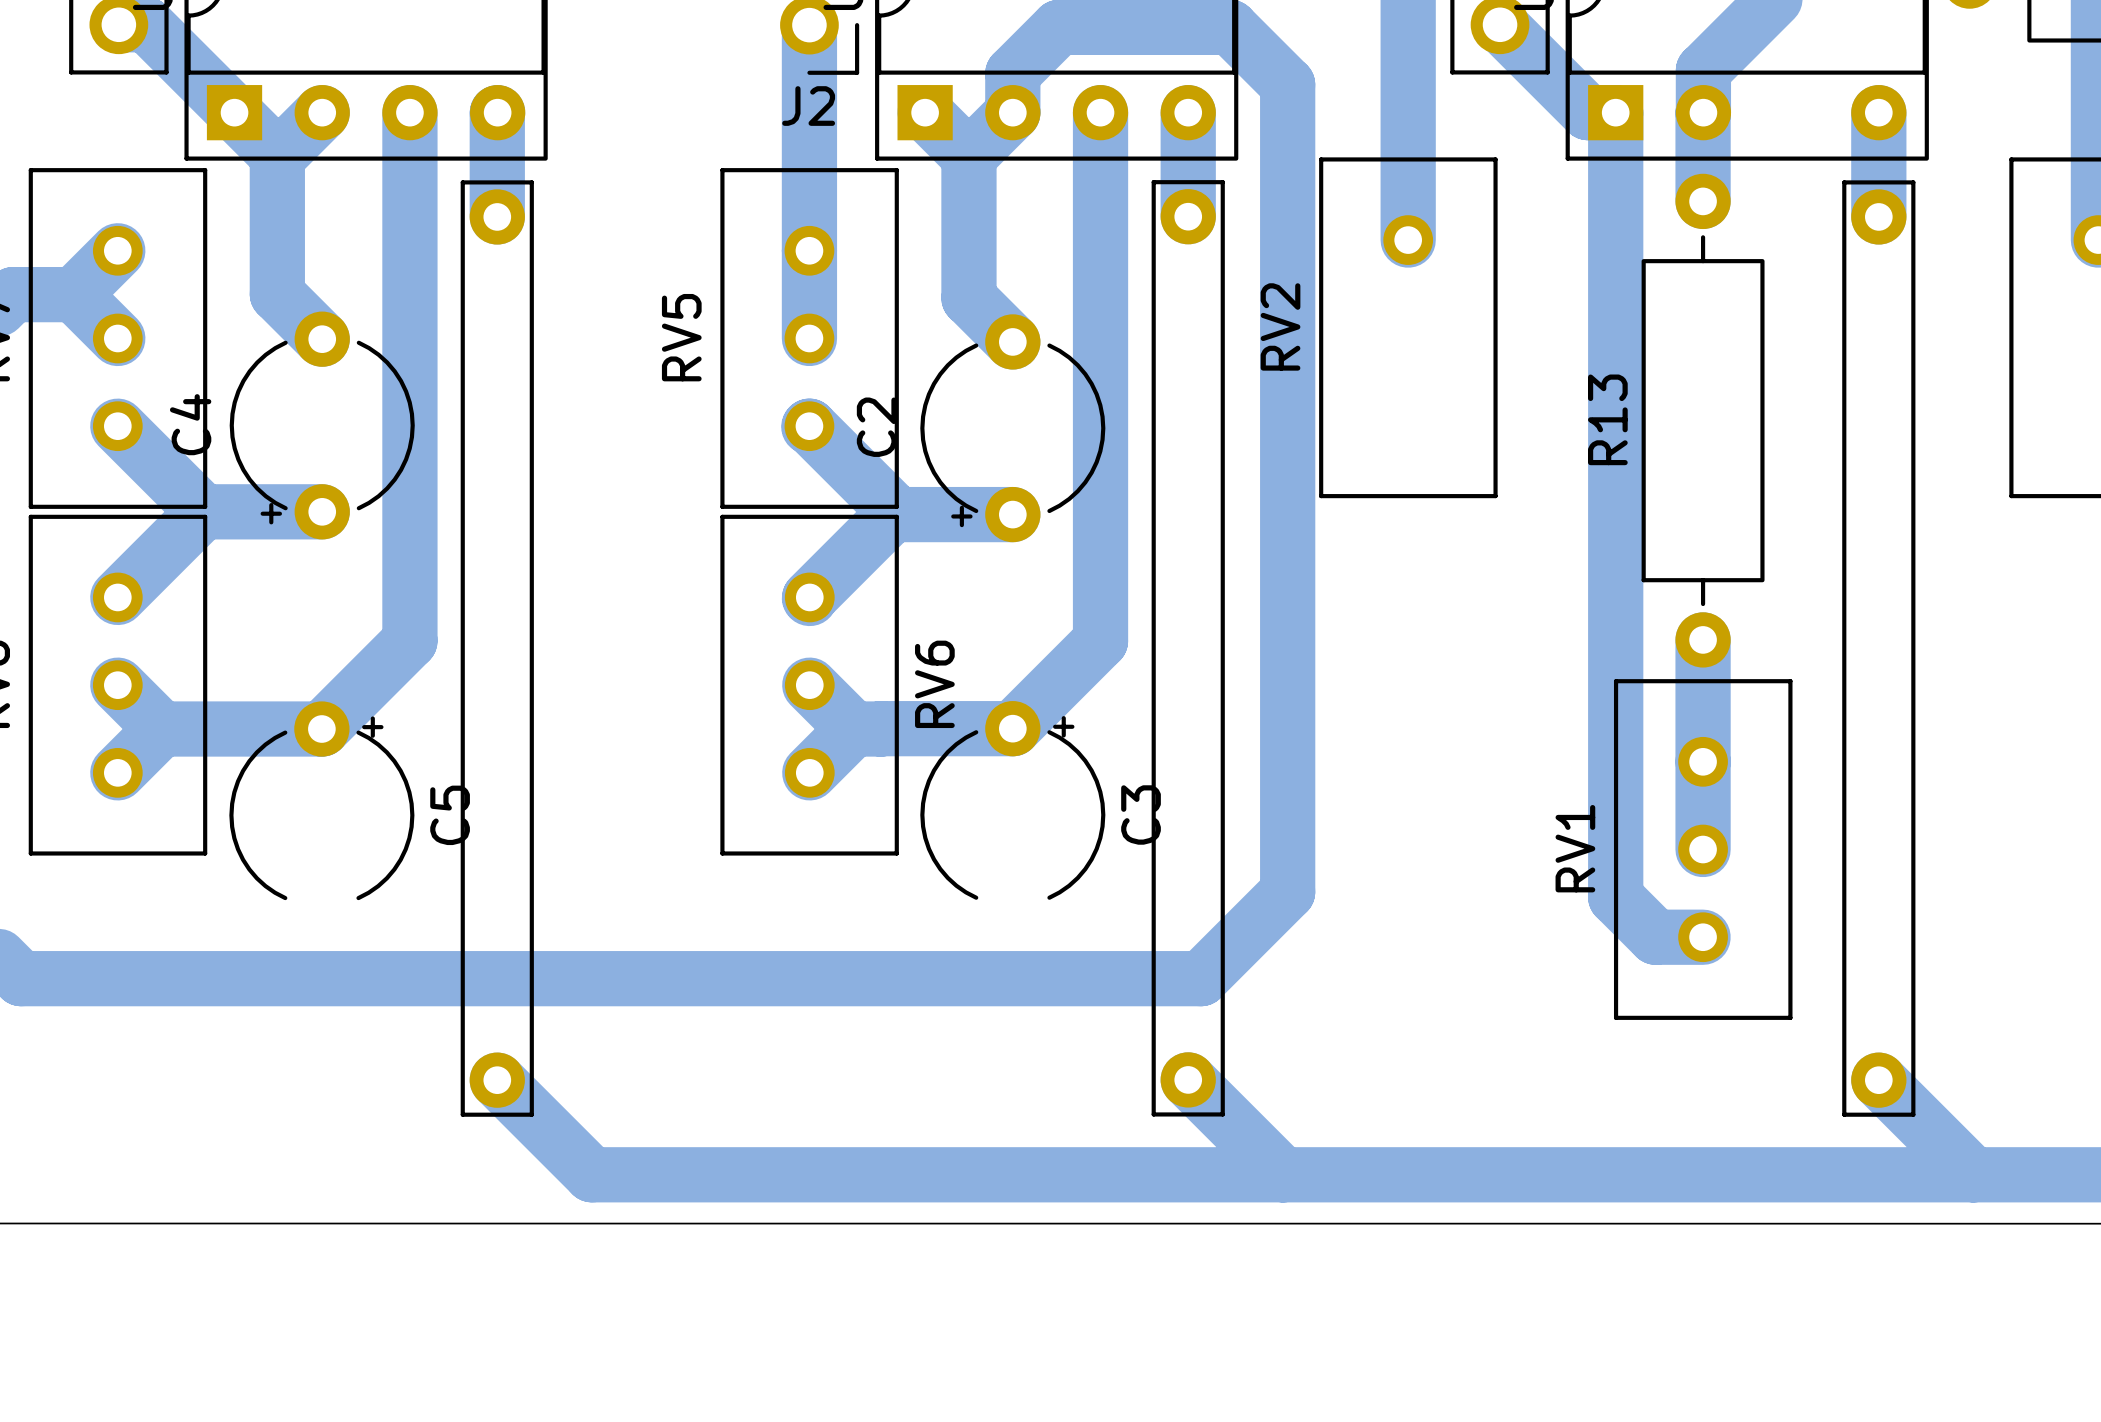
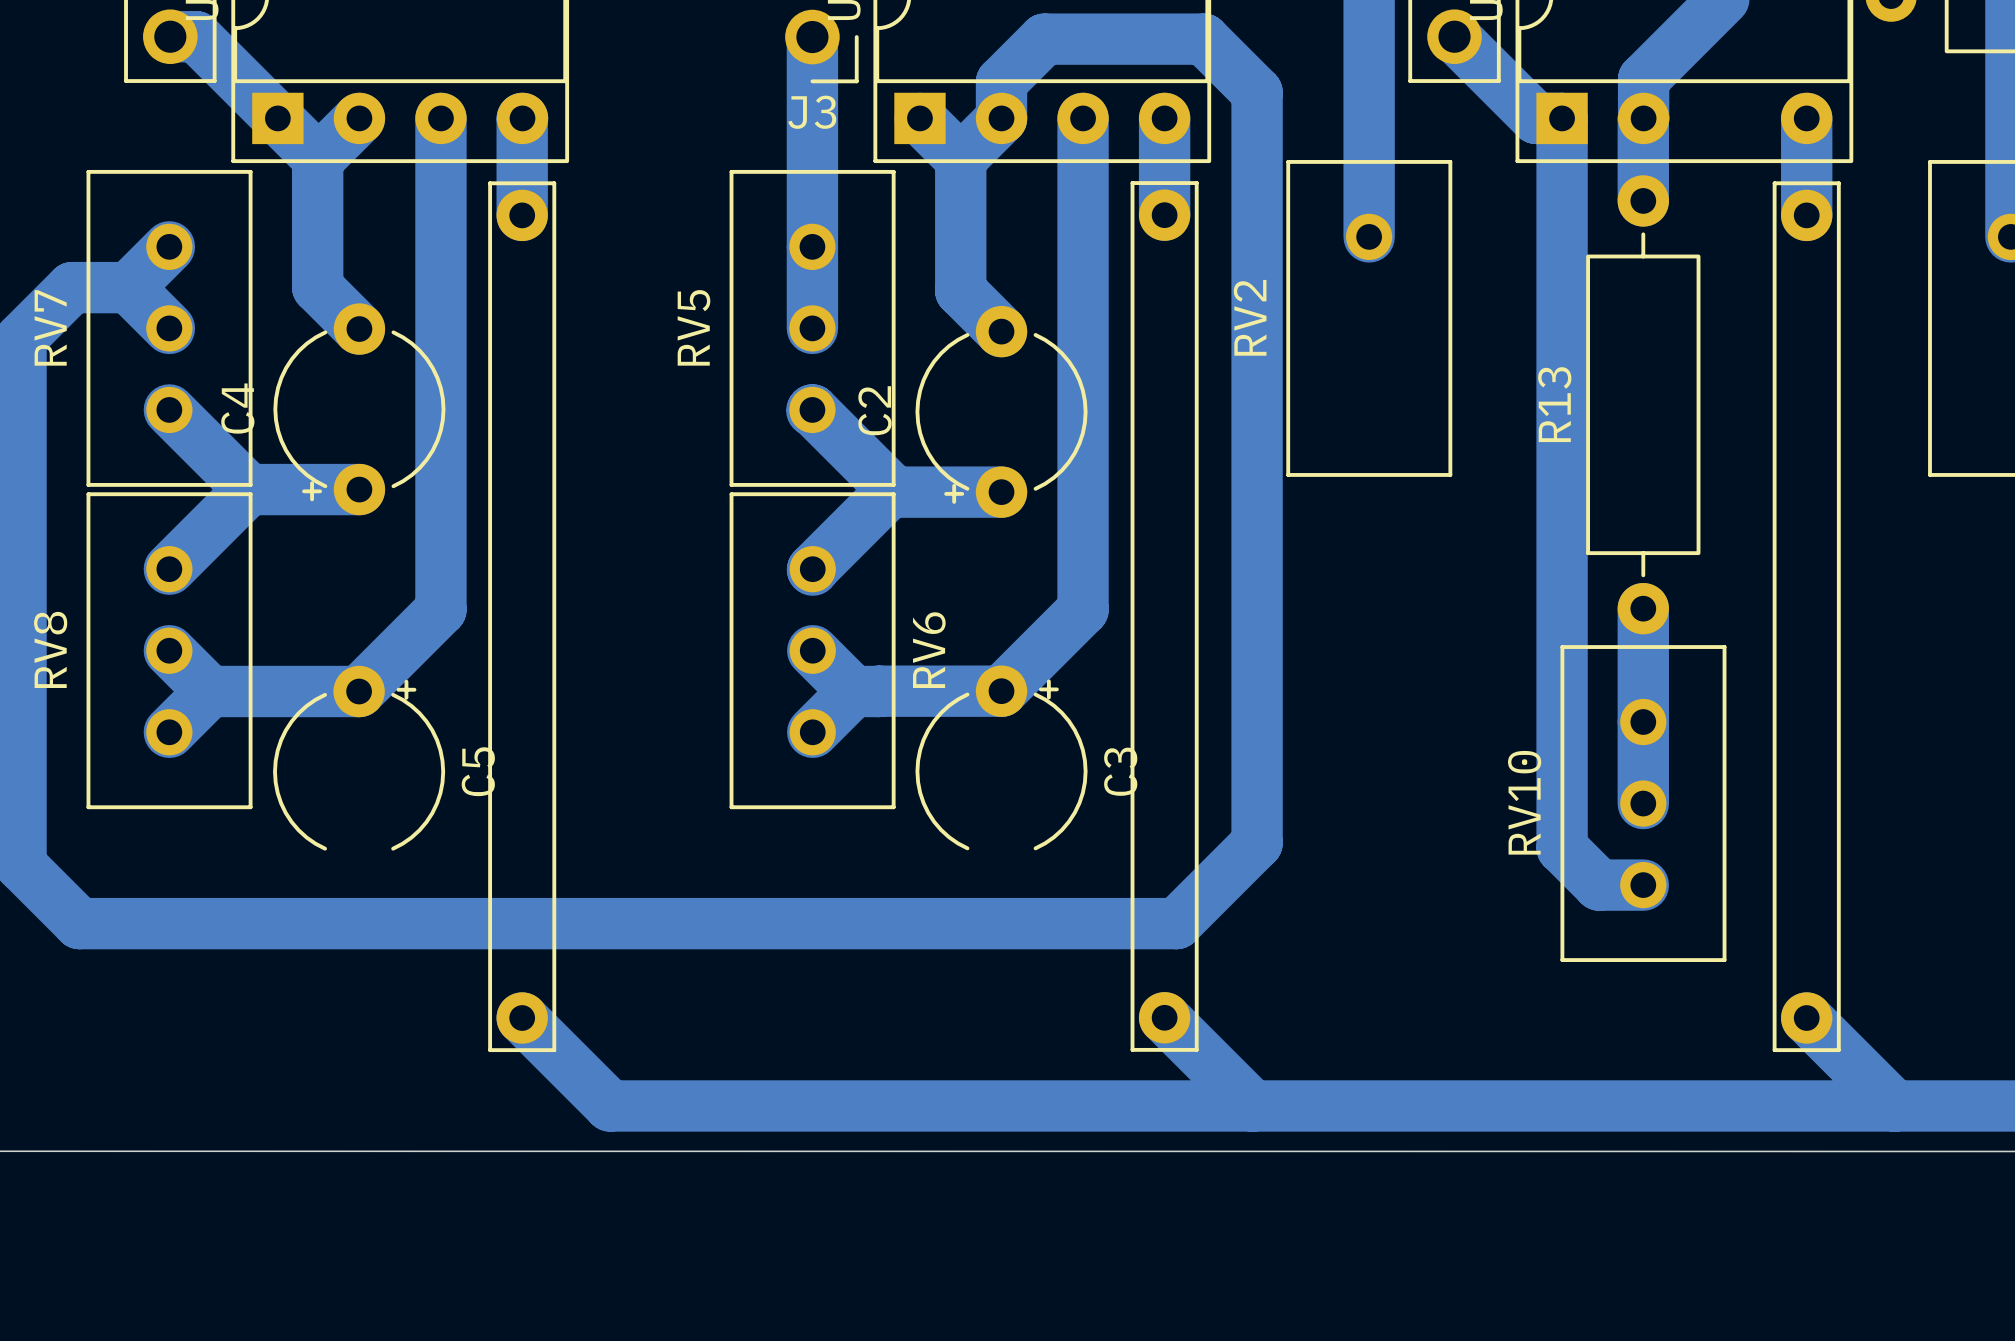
J2 name: J2 (808, 106) -> J3 (812, 112)
RV1 name: RV1 (1575, 848) -> RV10 (1524, 802)

